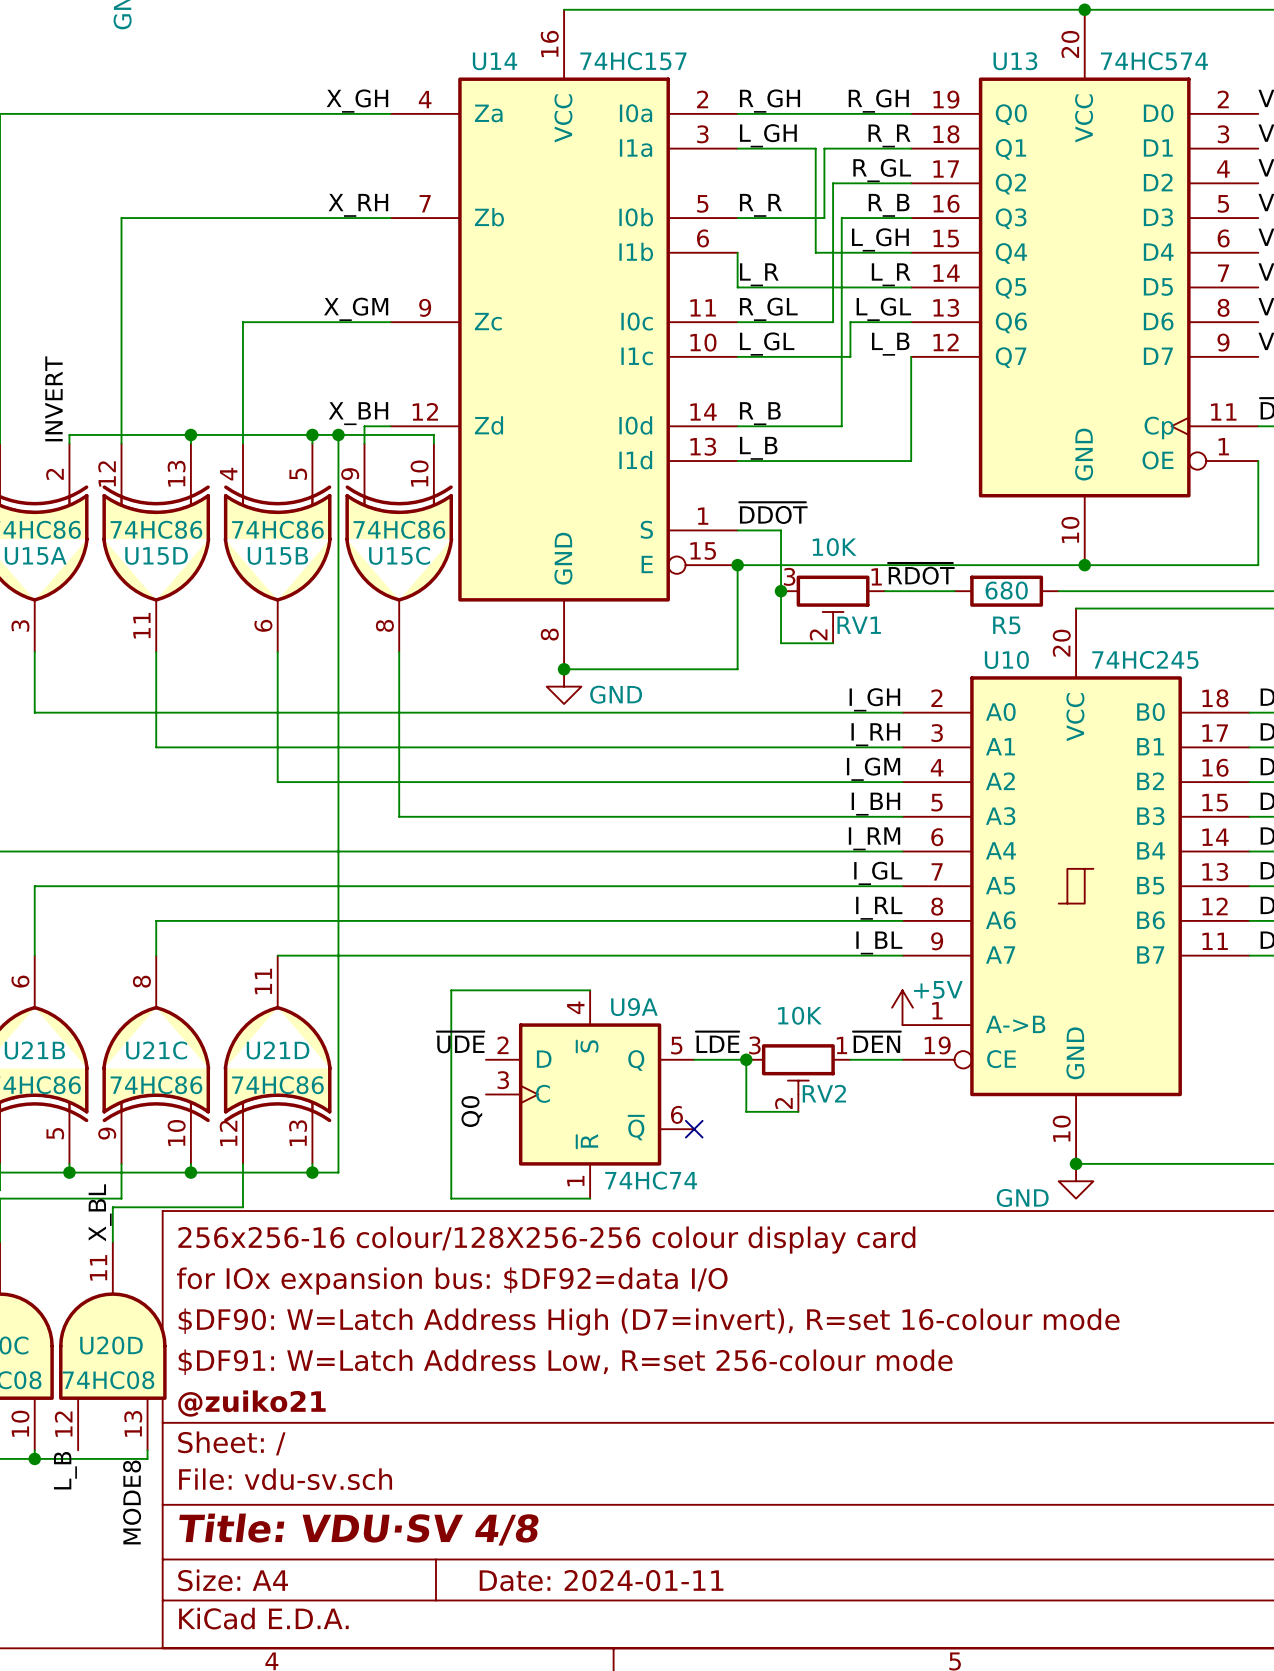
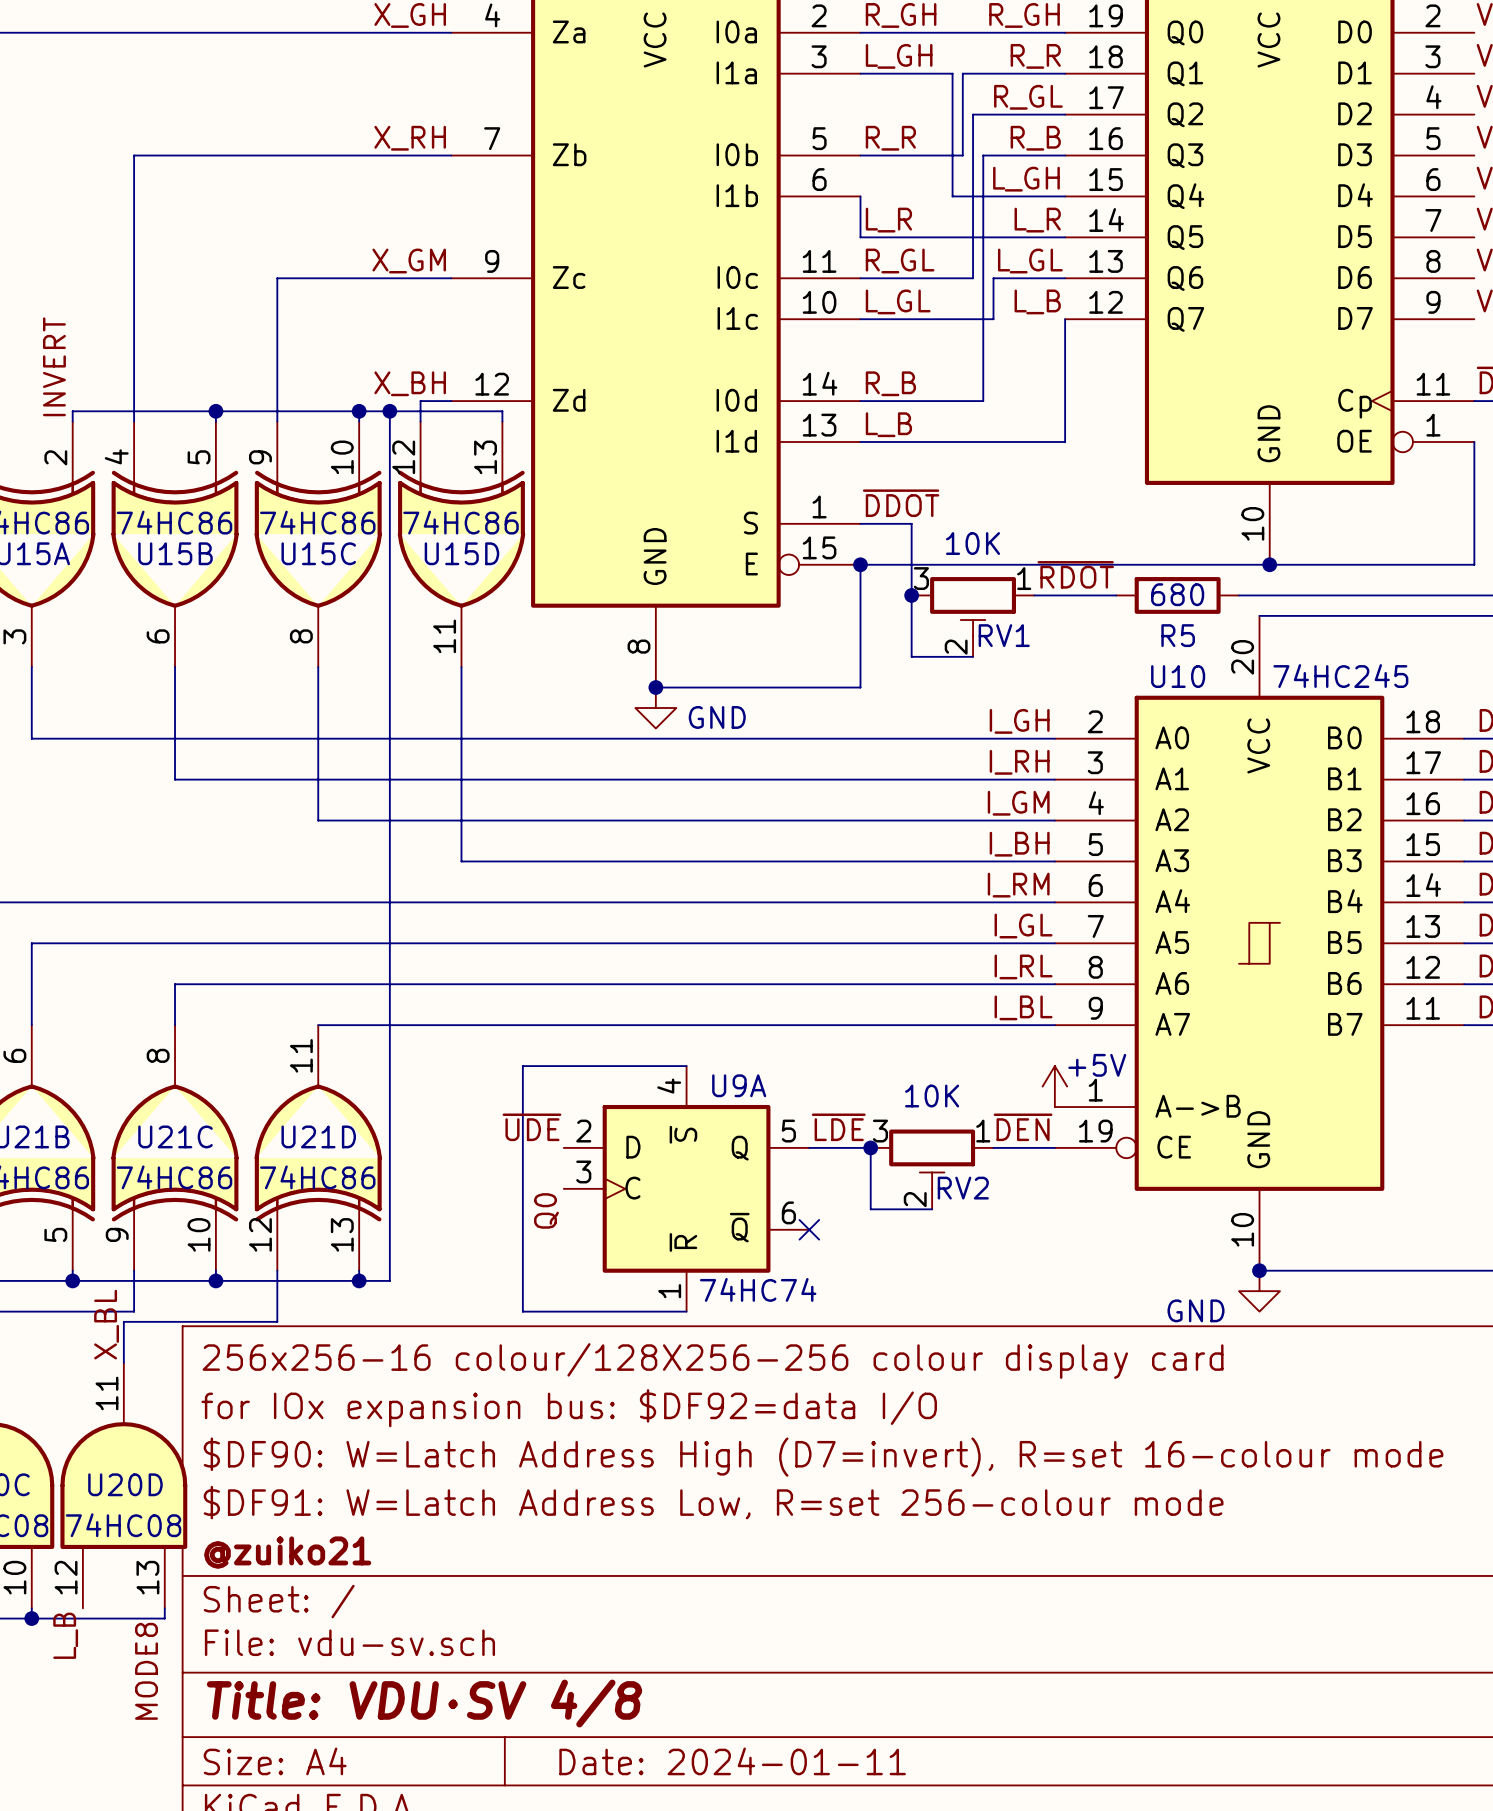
U15D position: (156, 547) -> (461, 544)
U15B position: (277, 547) -> (175, 544)
U15C position: (399, 547) -> (318, 544)

